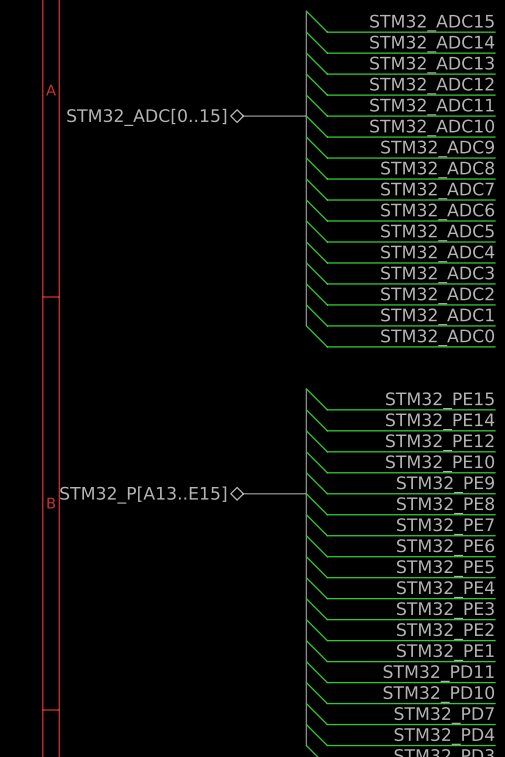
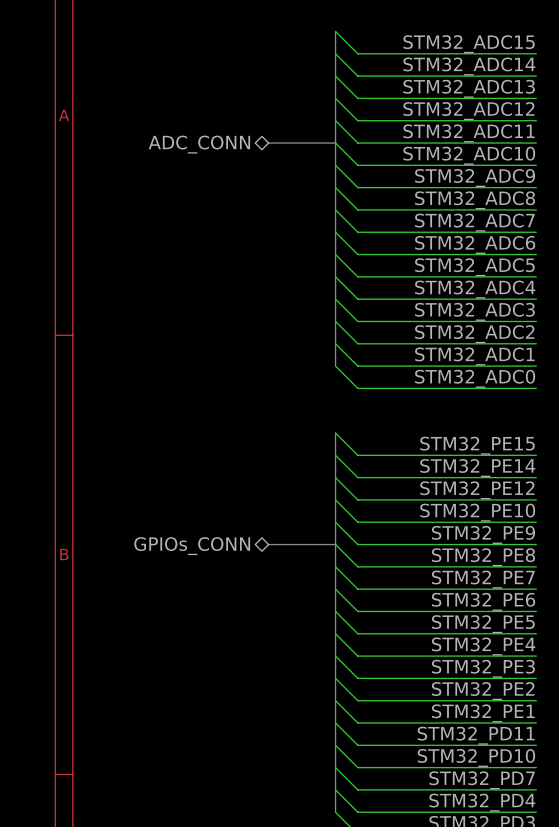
hierarchical label: STM32_ADC[0..15] (146, 117) -> ADC_CONN (199, 144)
hierarchical label: STM32_P[A13..E15] (143, 495) -> GPIOs_CONN (192, 546)

